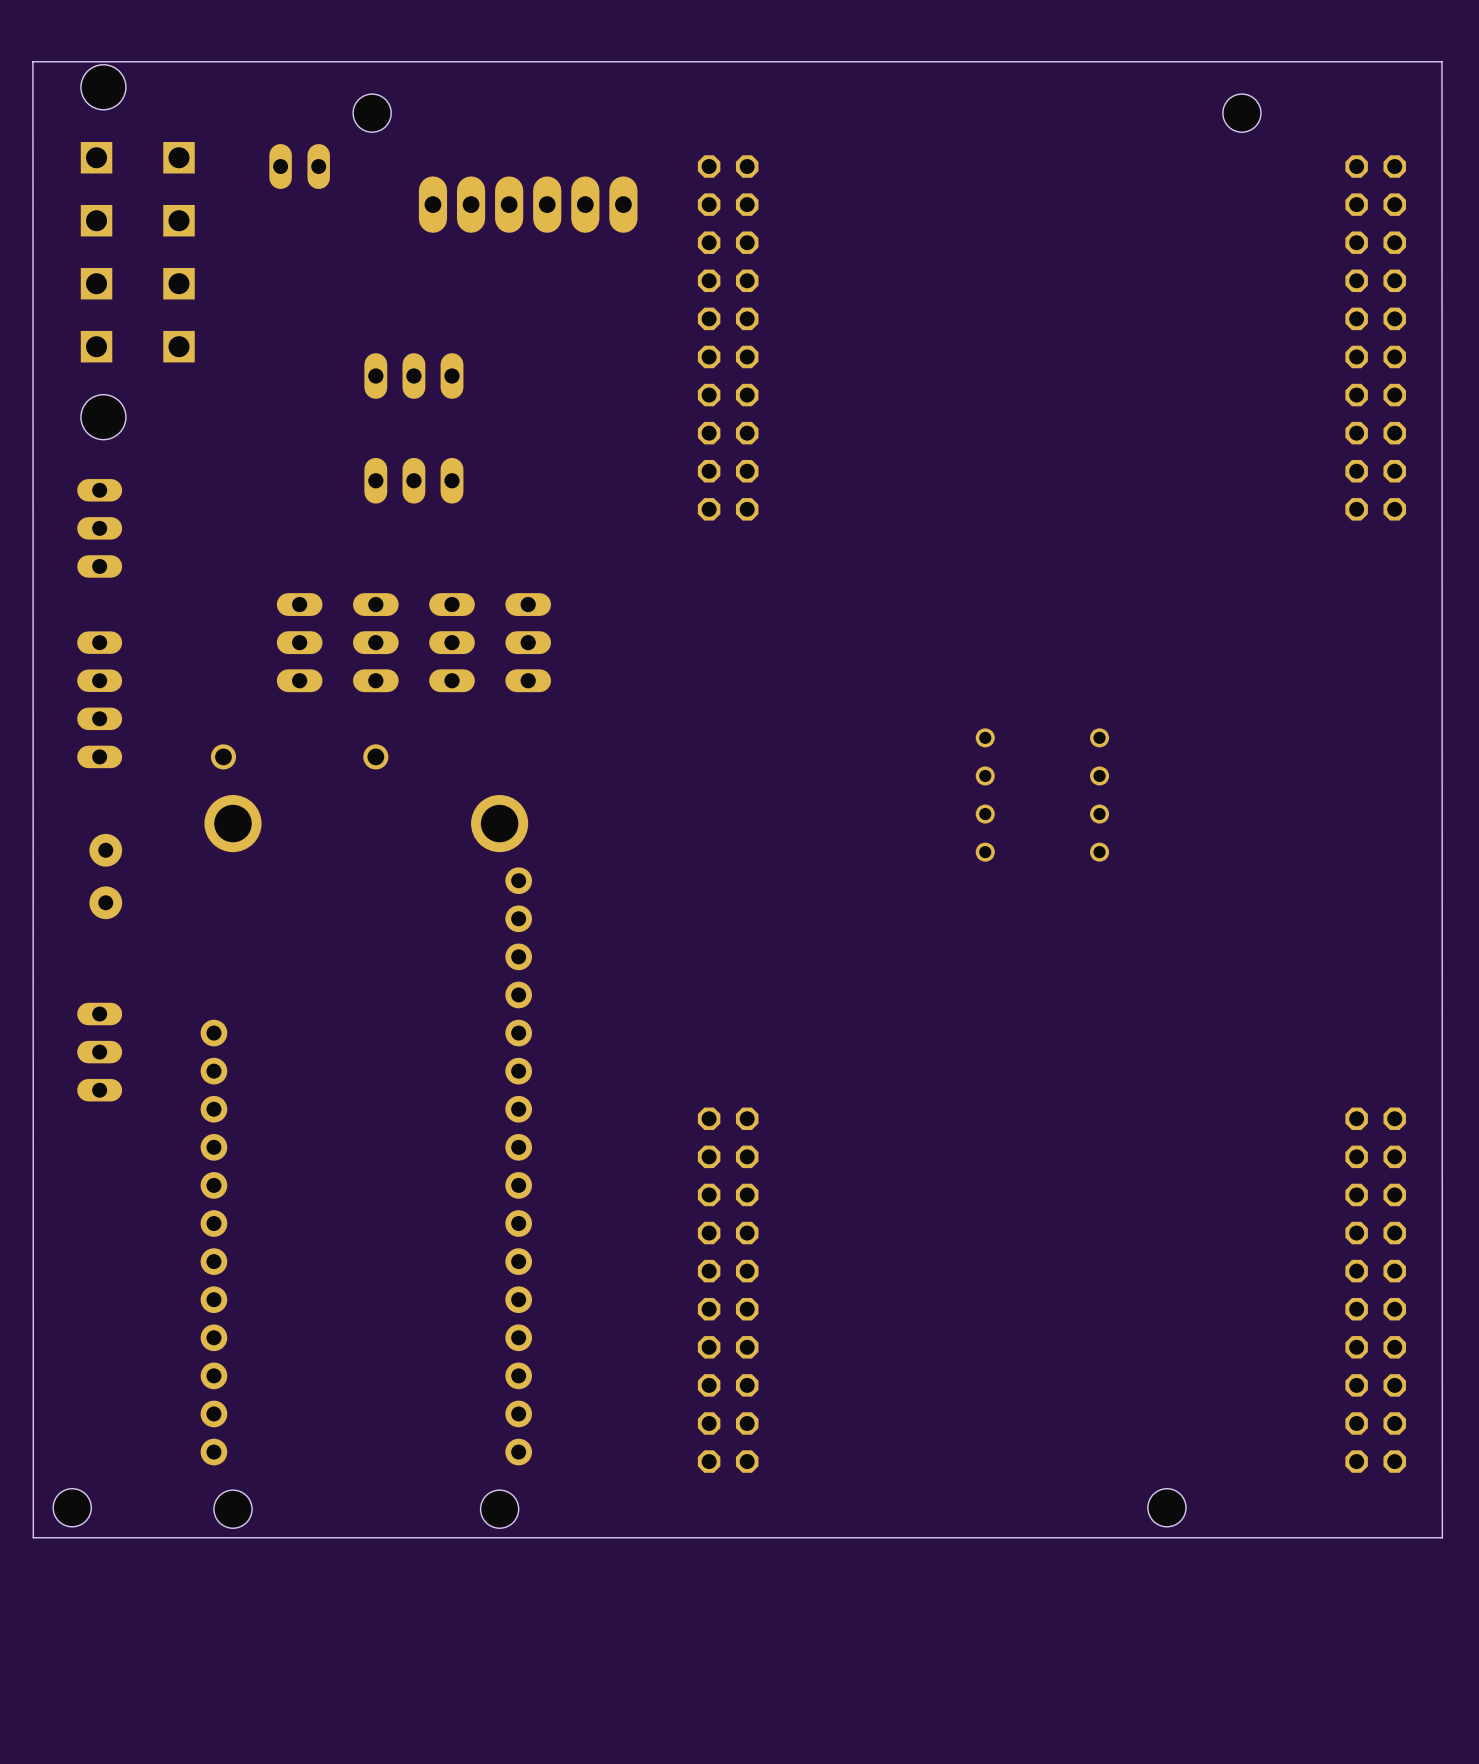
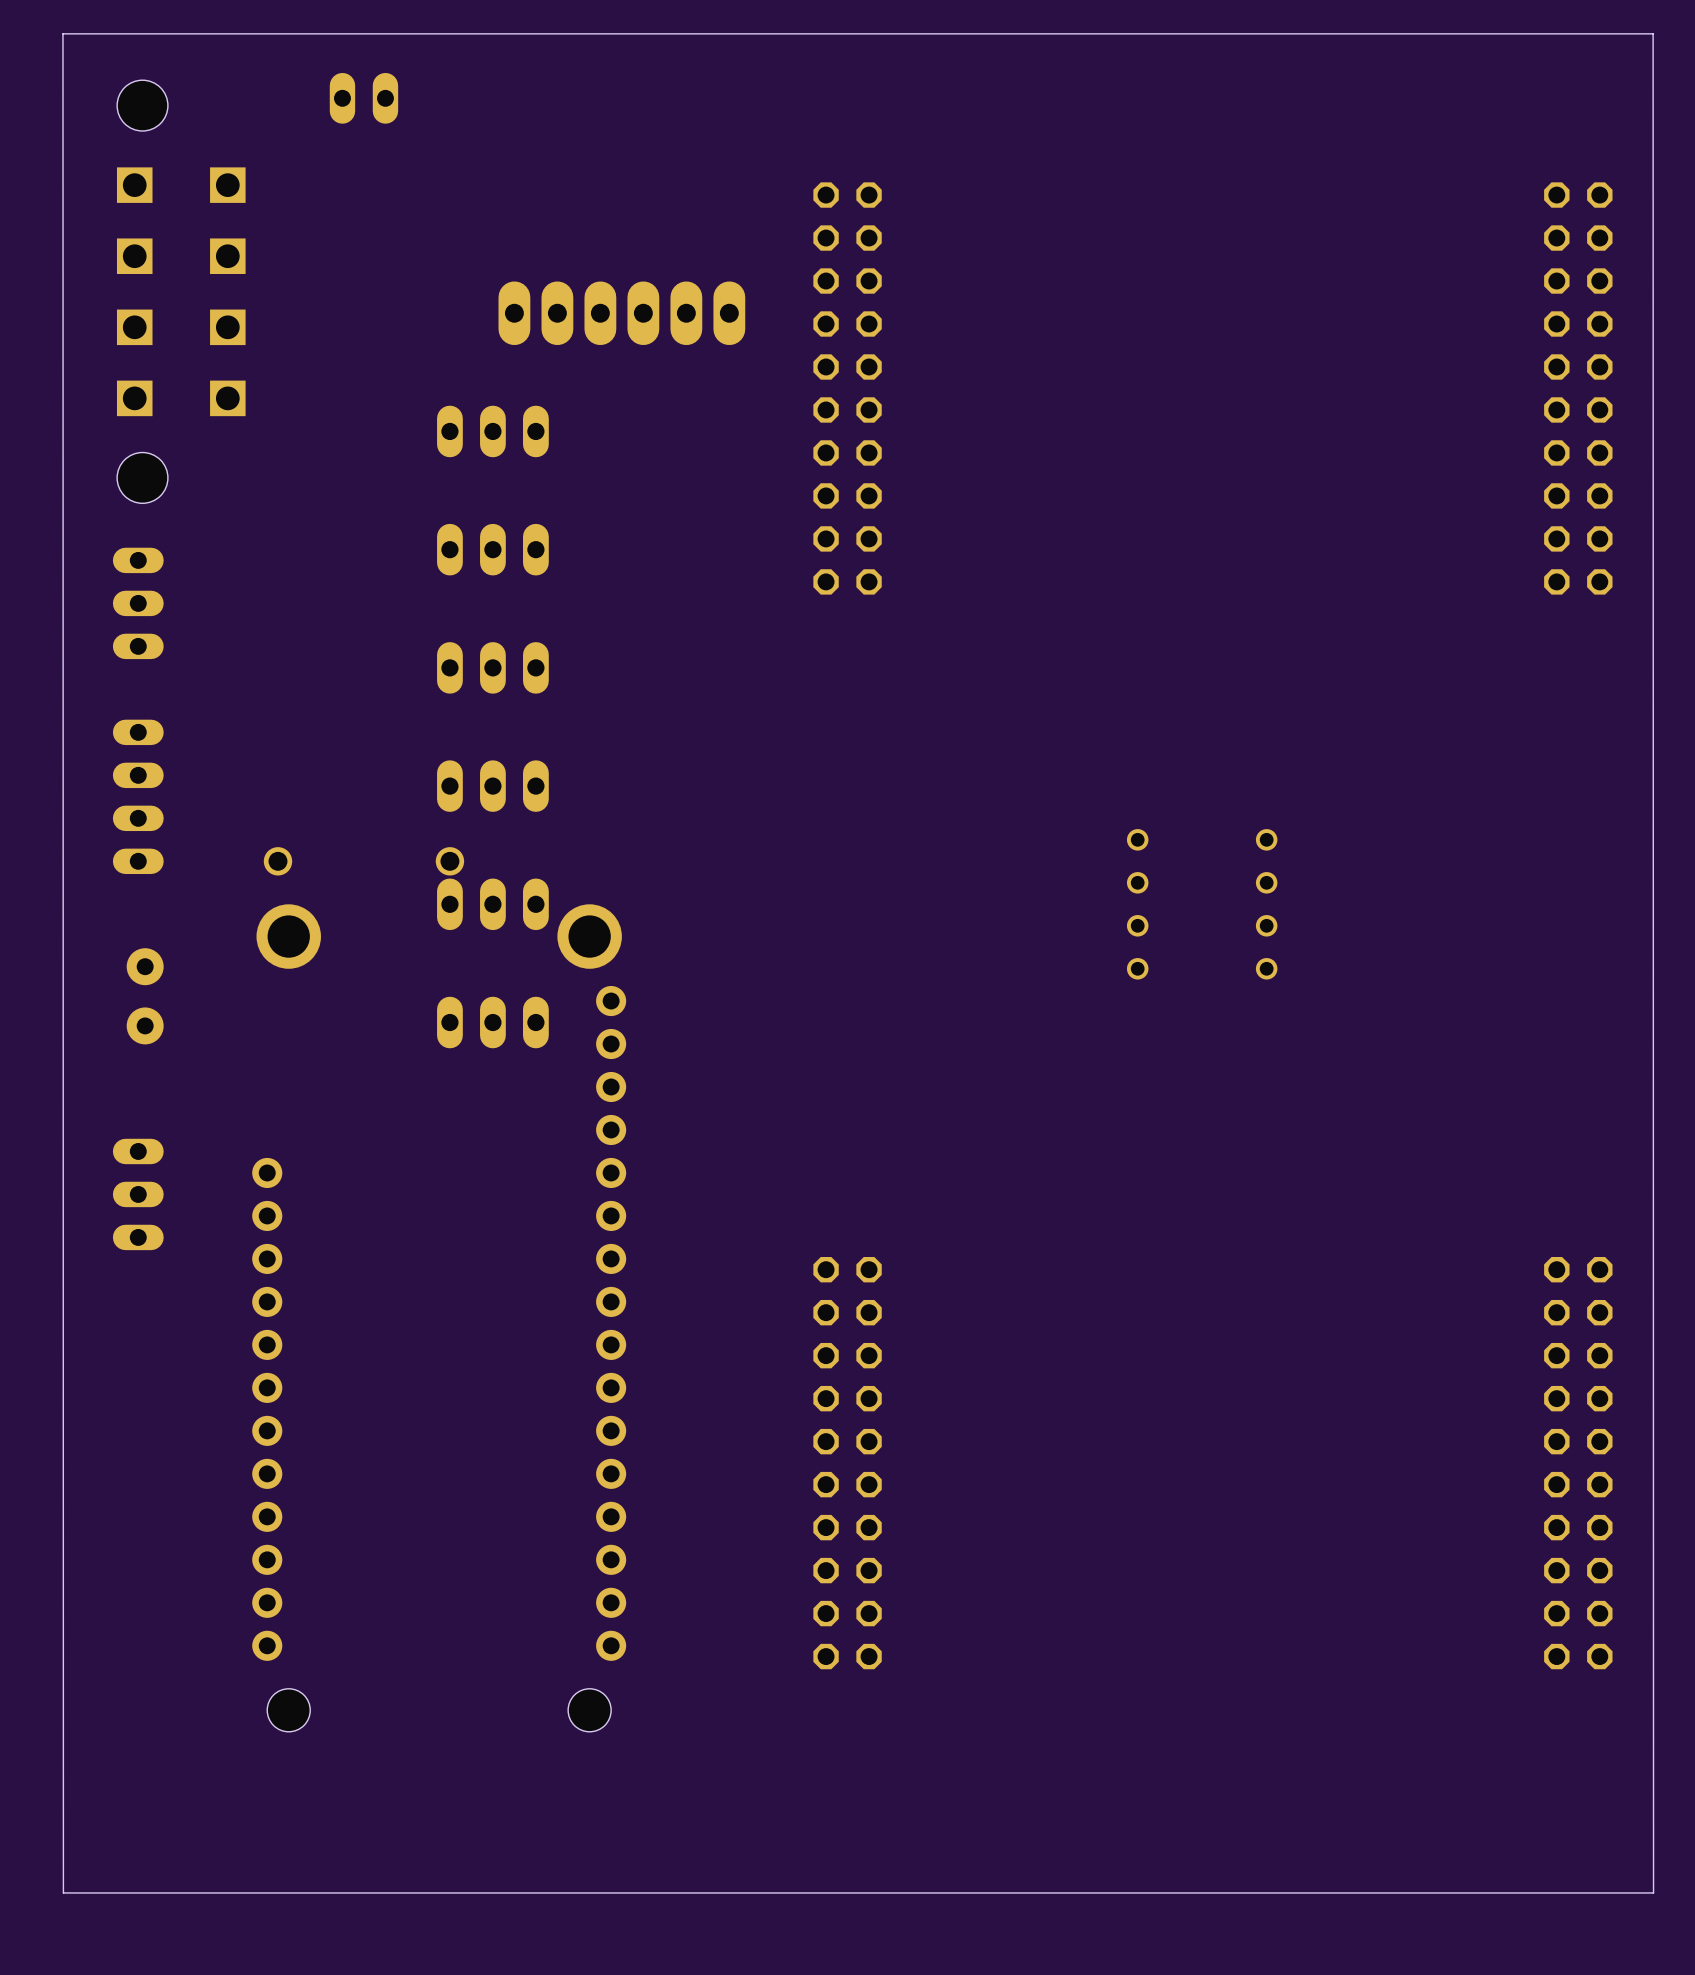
board edge: (1441, 61) (32, 61) (33, 1537) (1442, 1537) (1441, 61) -> (1653, 33) (1653, 1892) (63, 1892) (62, 33) (1653, 33)
hole: (372, 113) -> none
hole: (1241, 113) -> none
part position: (299, 166) -> (363, 98)
part position: (528, 204) -> (621, 313)
part: none -> (492, 667)
part: (299, 642) -> none
part: (375, 642) -> none
part: (452, 642) -> none
part: (528, 642) -> none
part: none -> (492, 786)
part: none -> (492, 904)
part: none -> (492, 1022)
hole: (72, 1507) -> none
hole: (1166, 1507) -> none

